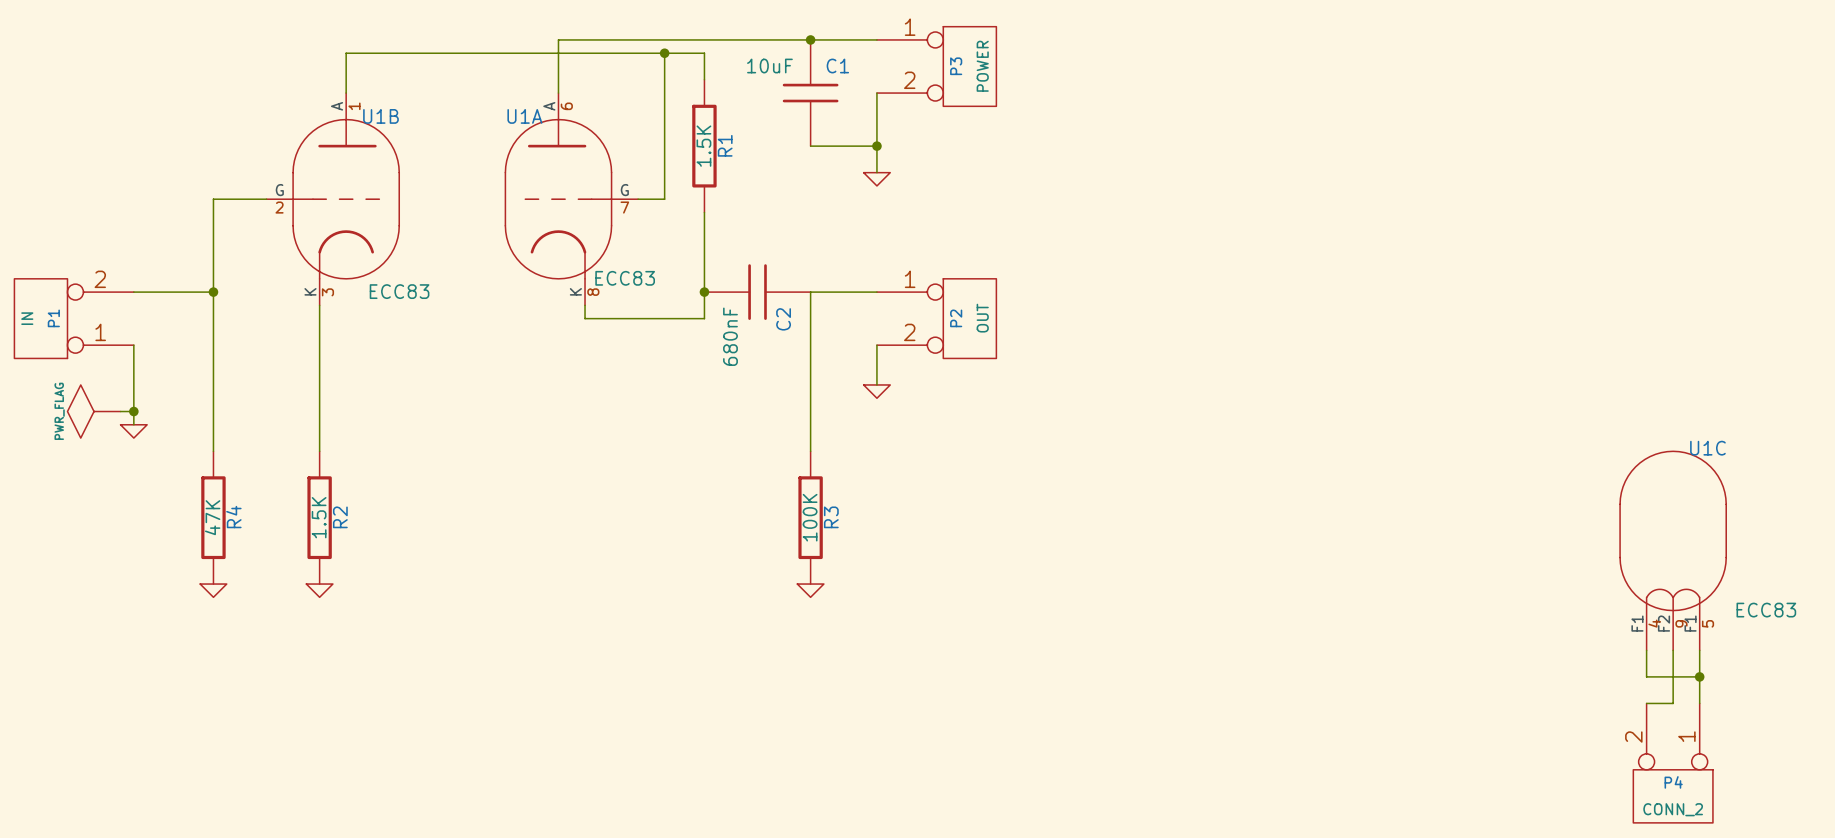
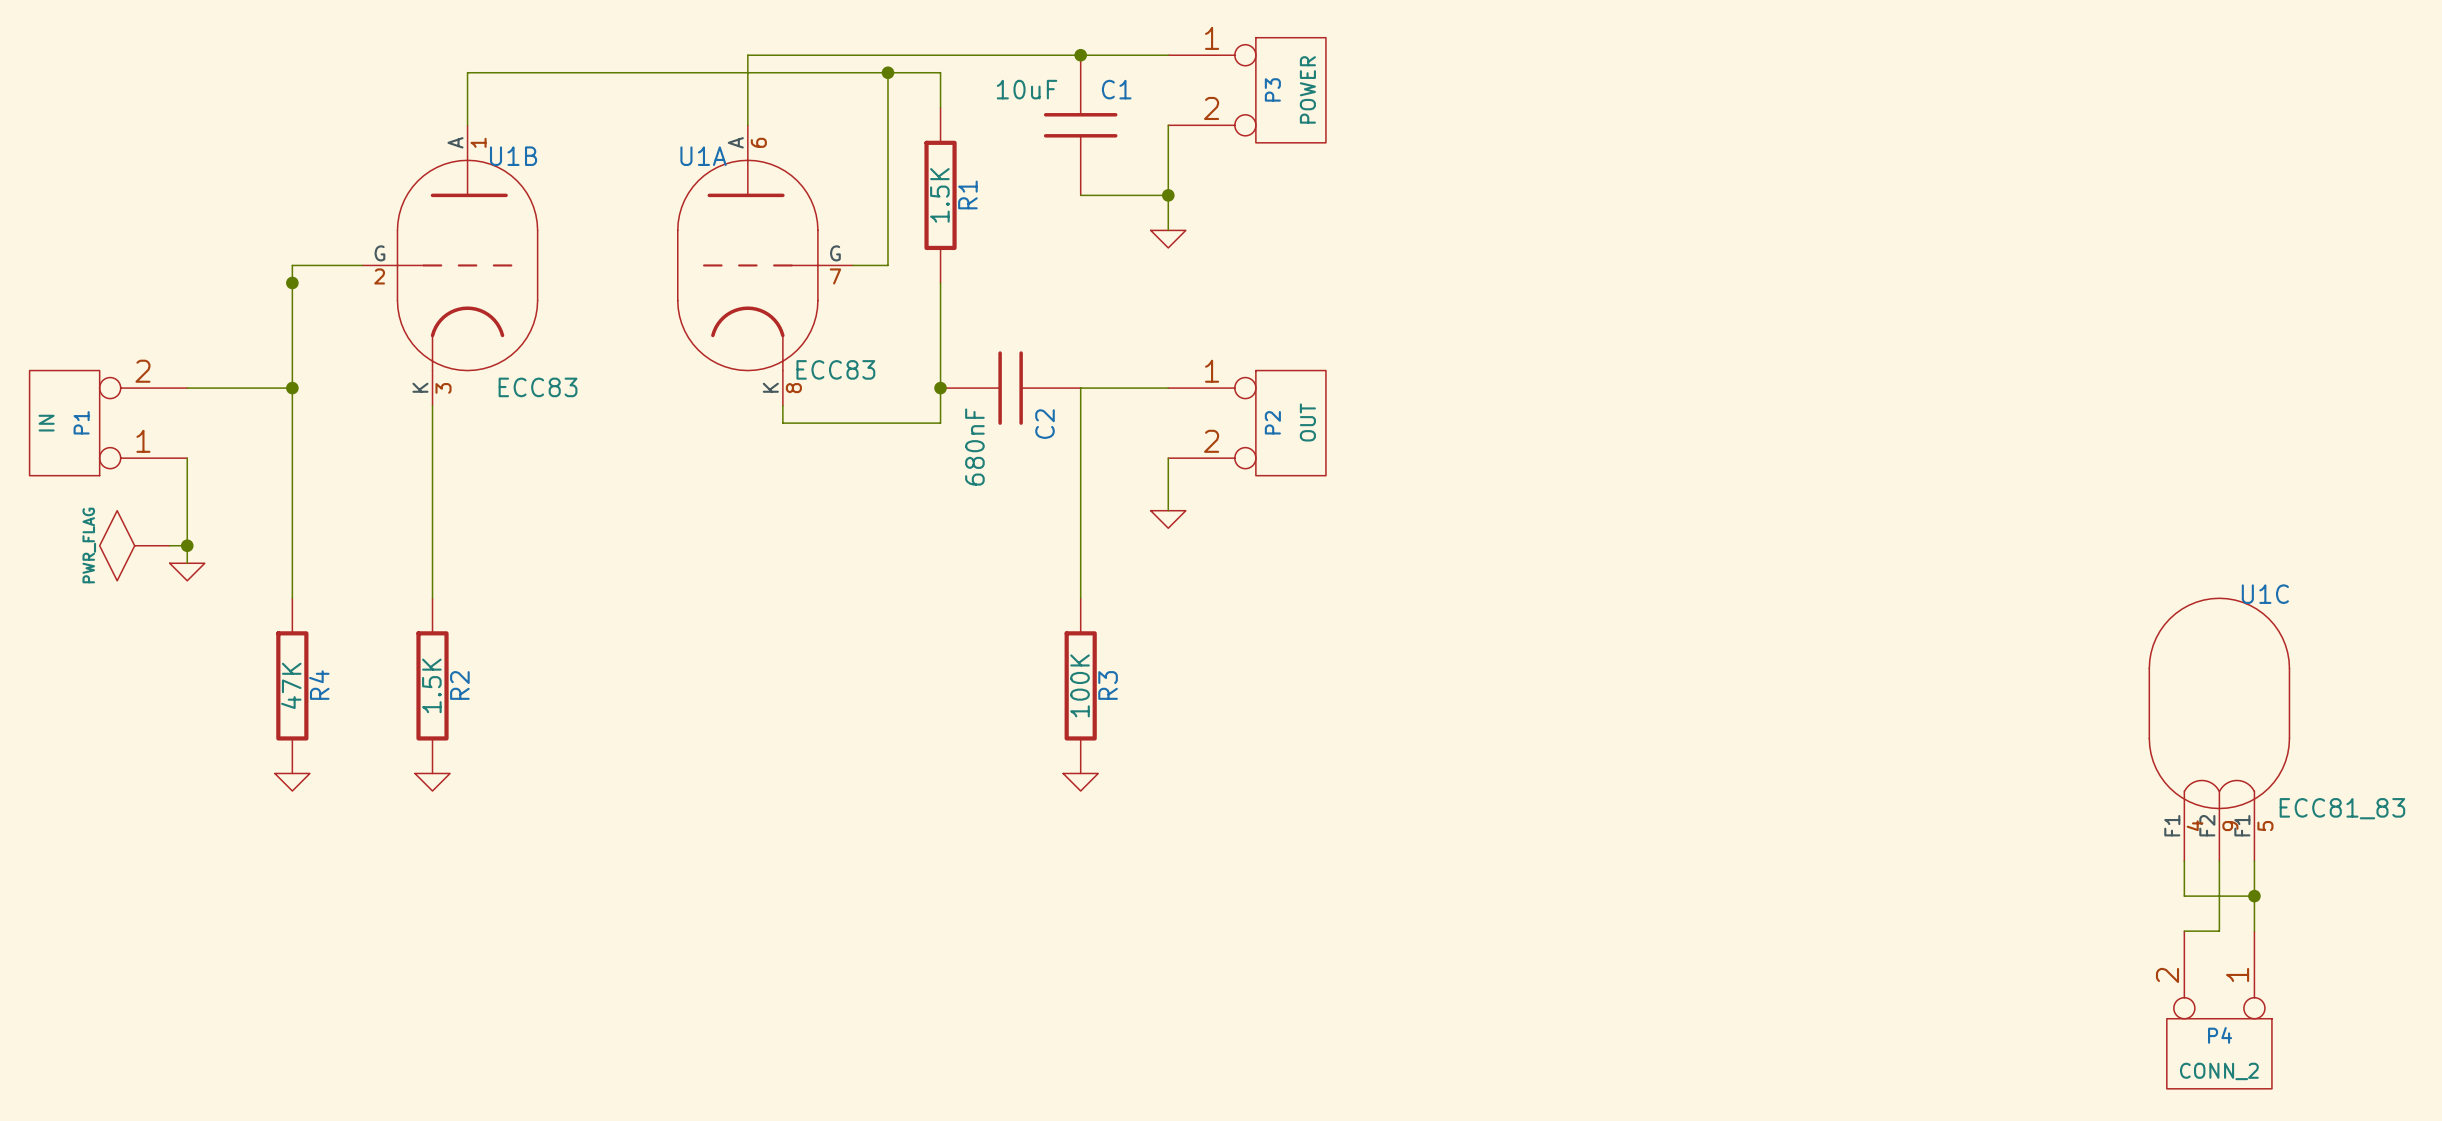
junction: none -> (292, 282)
U1C value: ECC83 (1766, 610) -> ECC81_83 (2342, 808)

